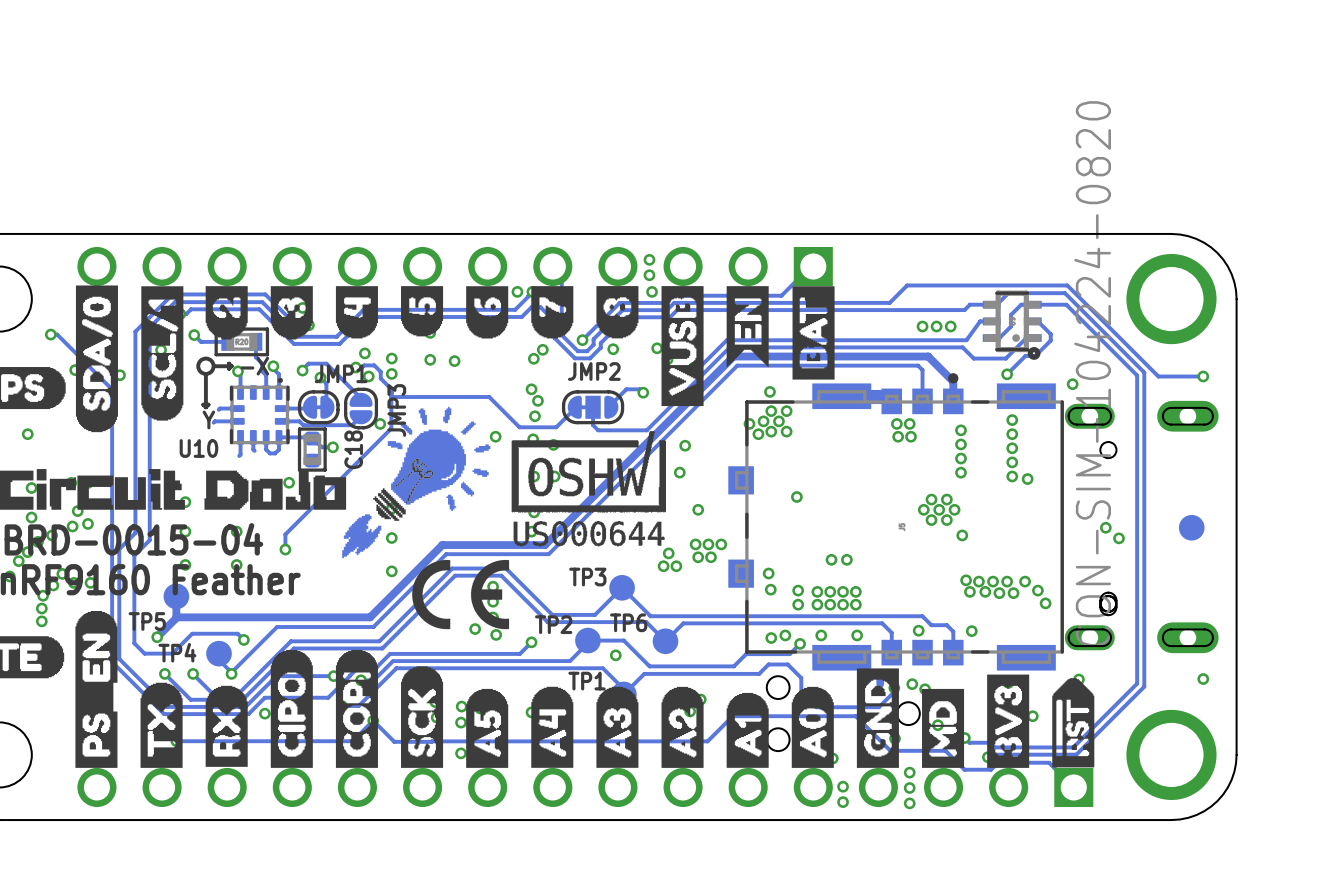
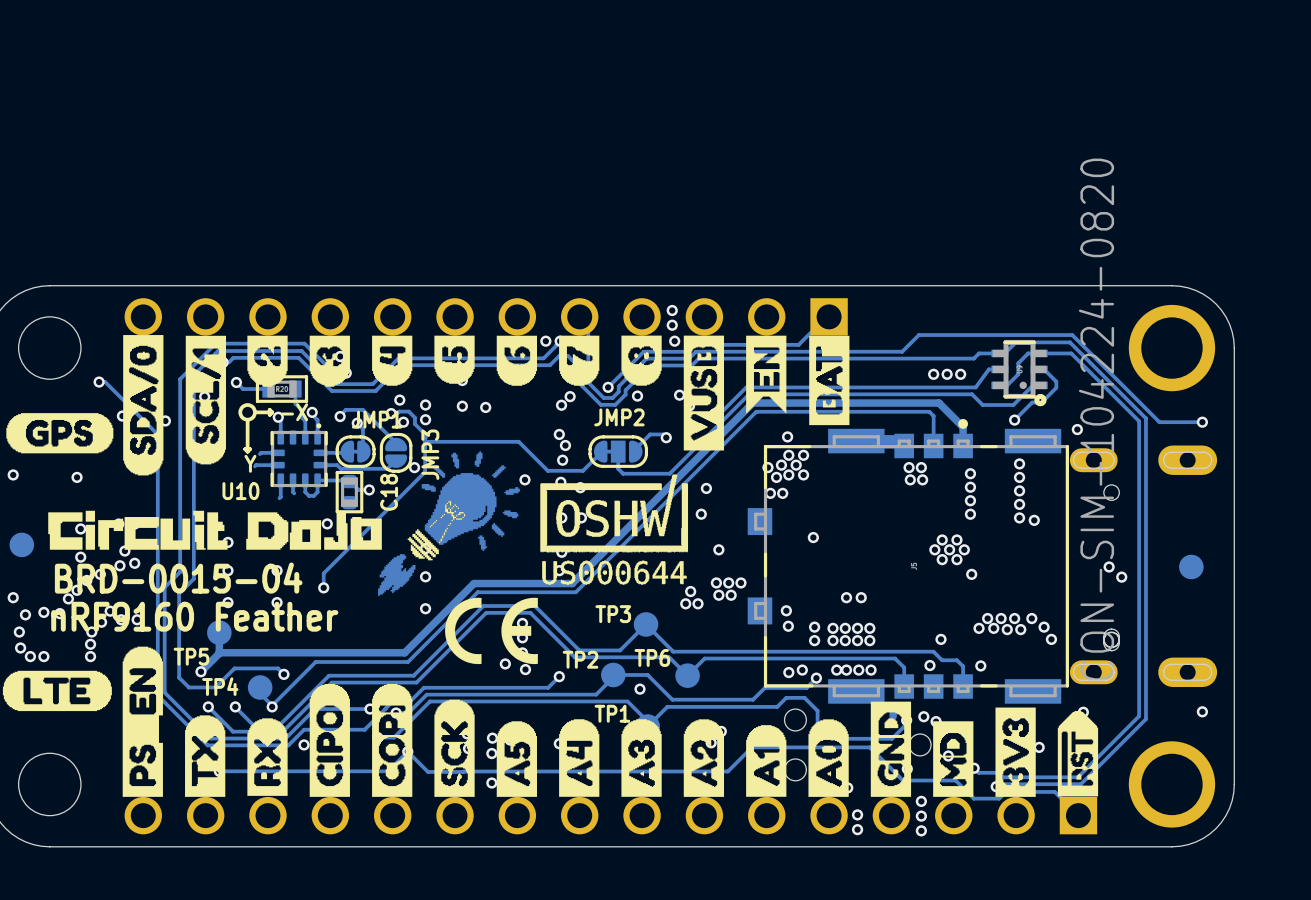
via: none -> (770, 493)
via: none -> (782, 493)
via position: (966, 580) -> (941, 639)
via: none -> (846, 670)
via: none -> (858, 670)

